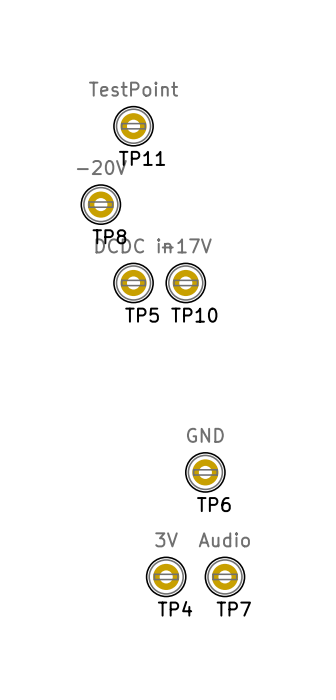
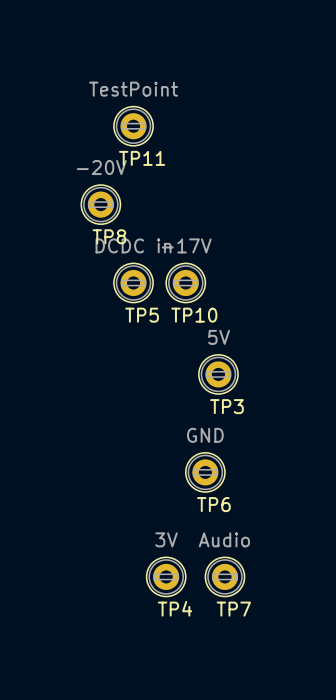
TP3: none -> 5V (218, 374)

